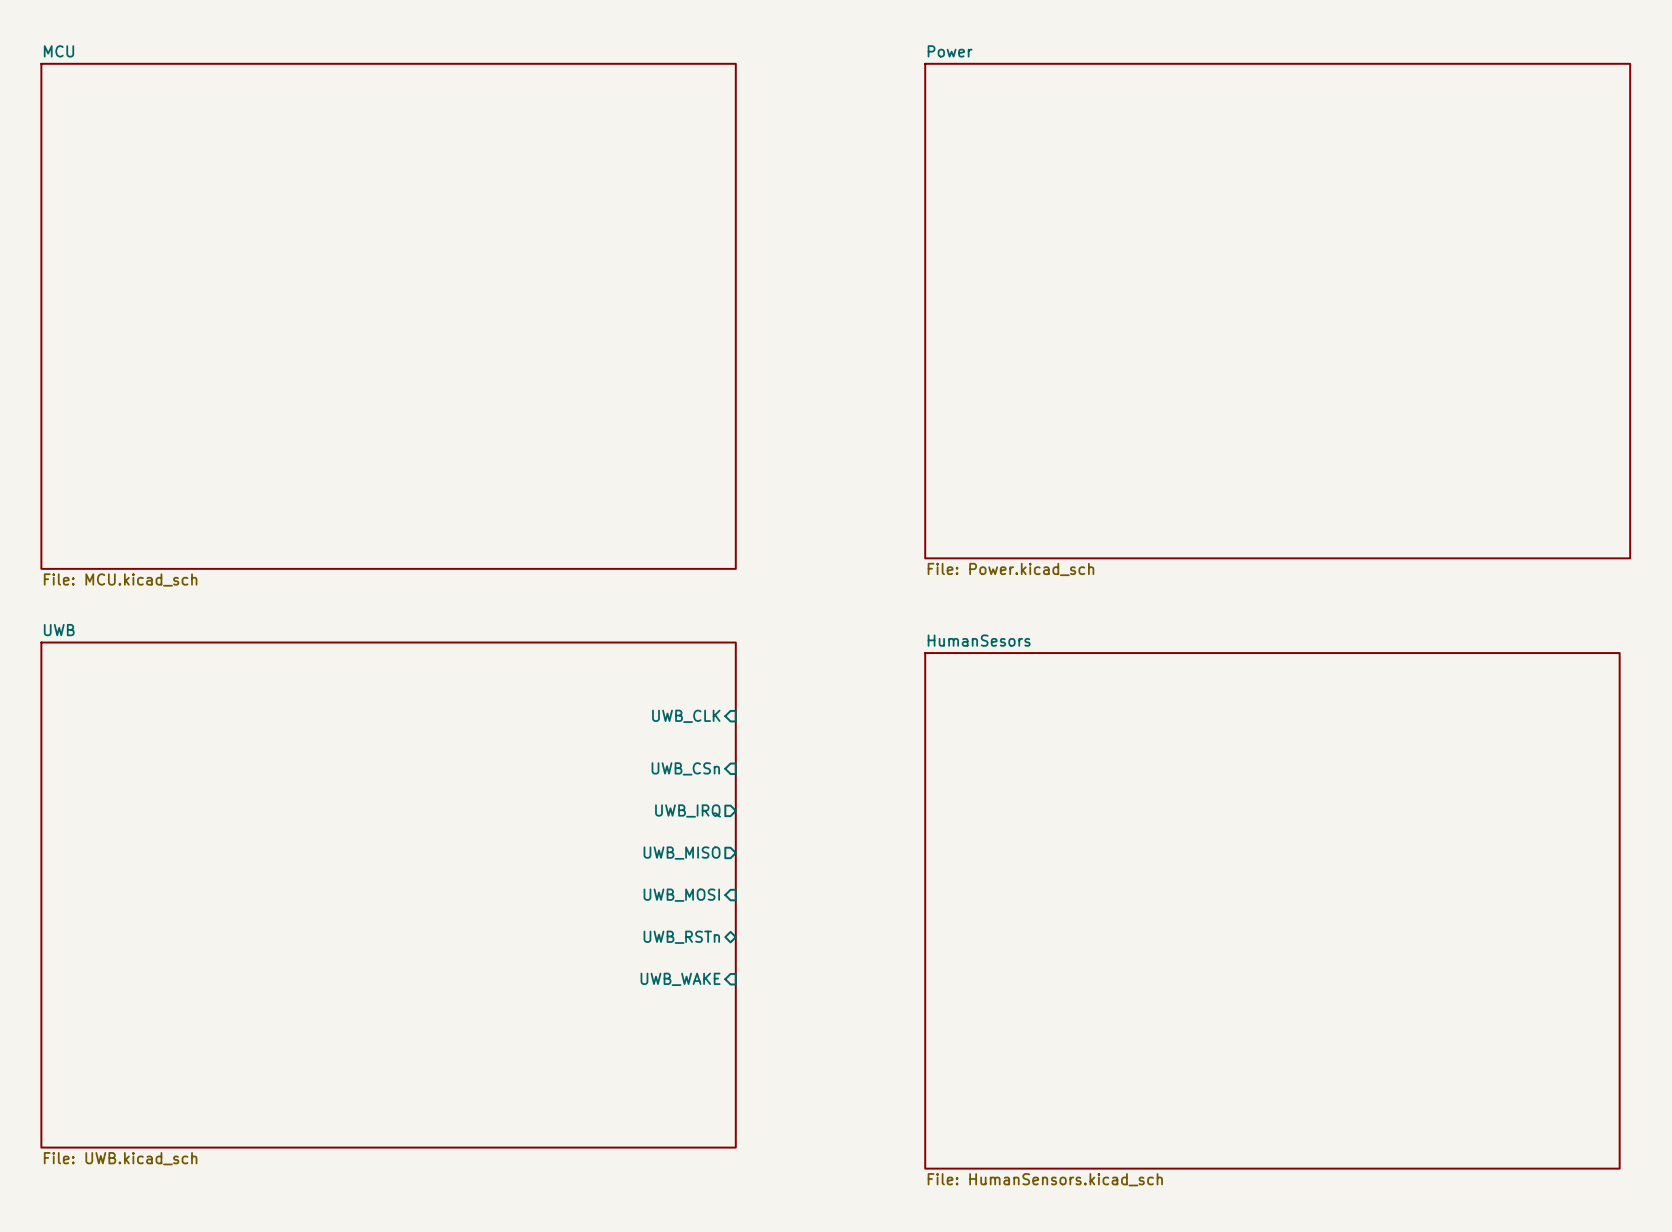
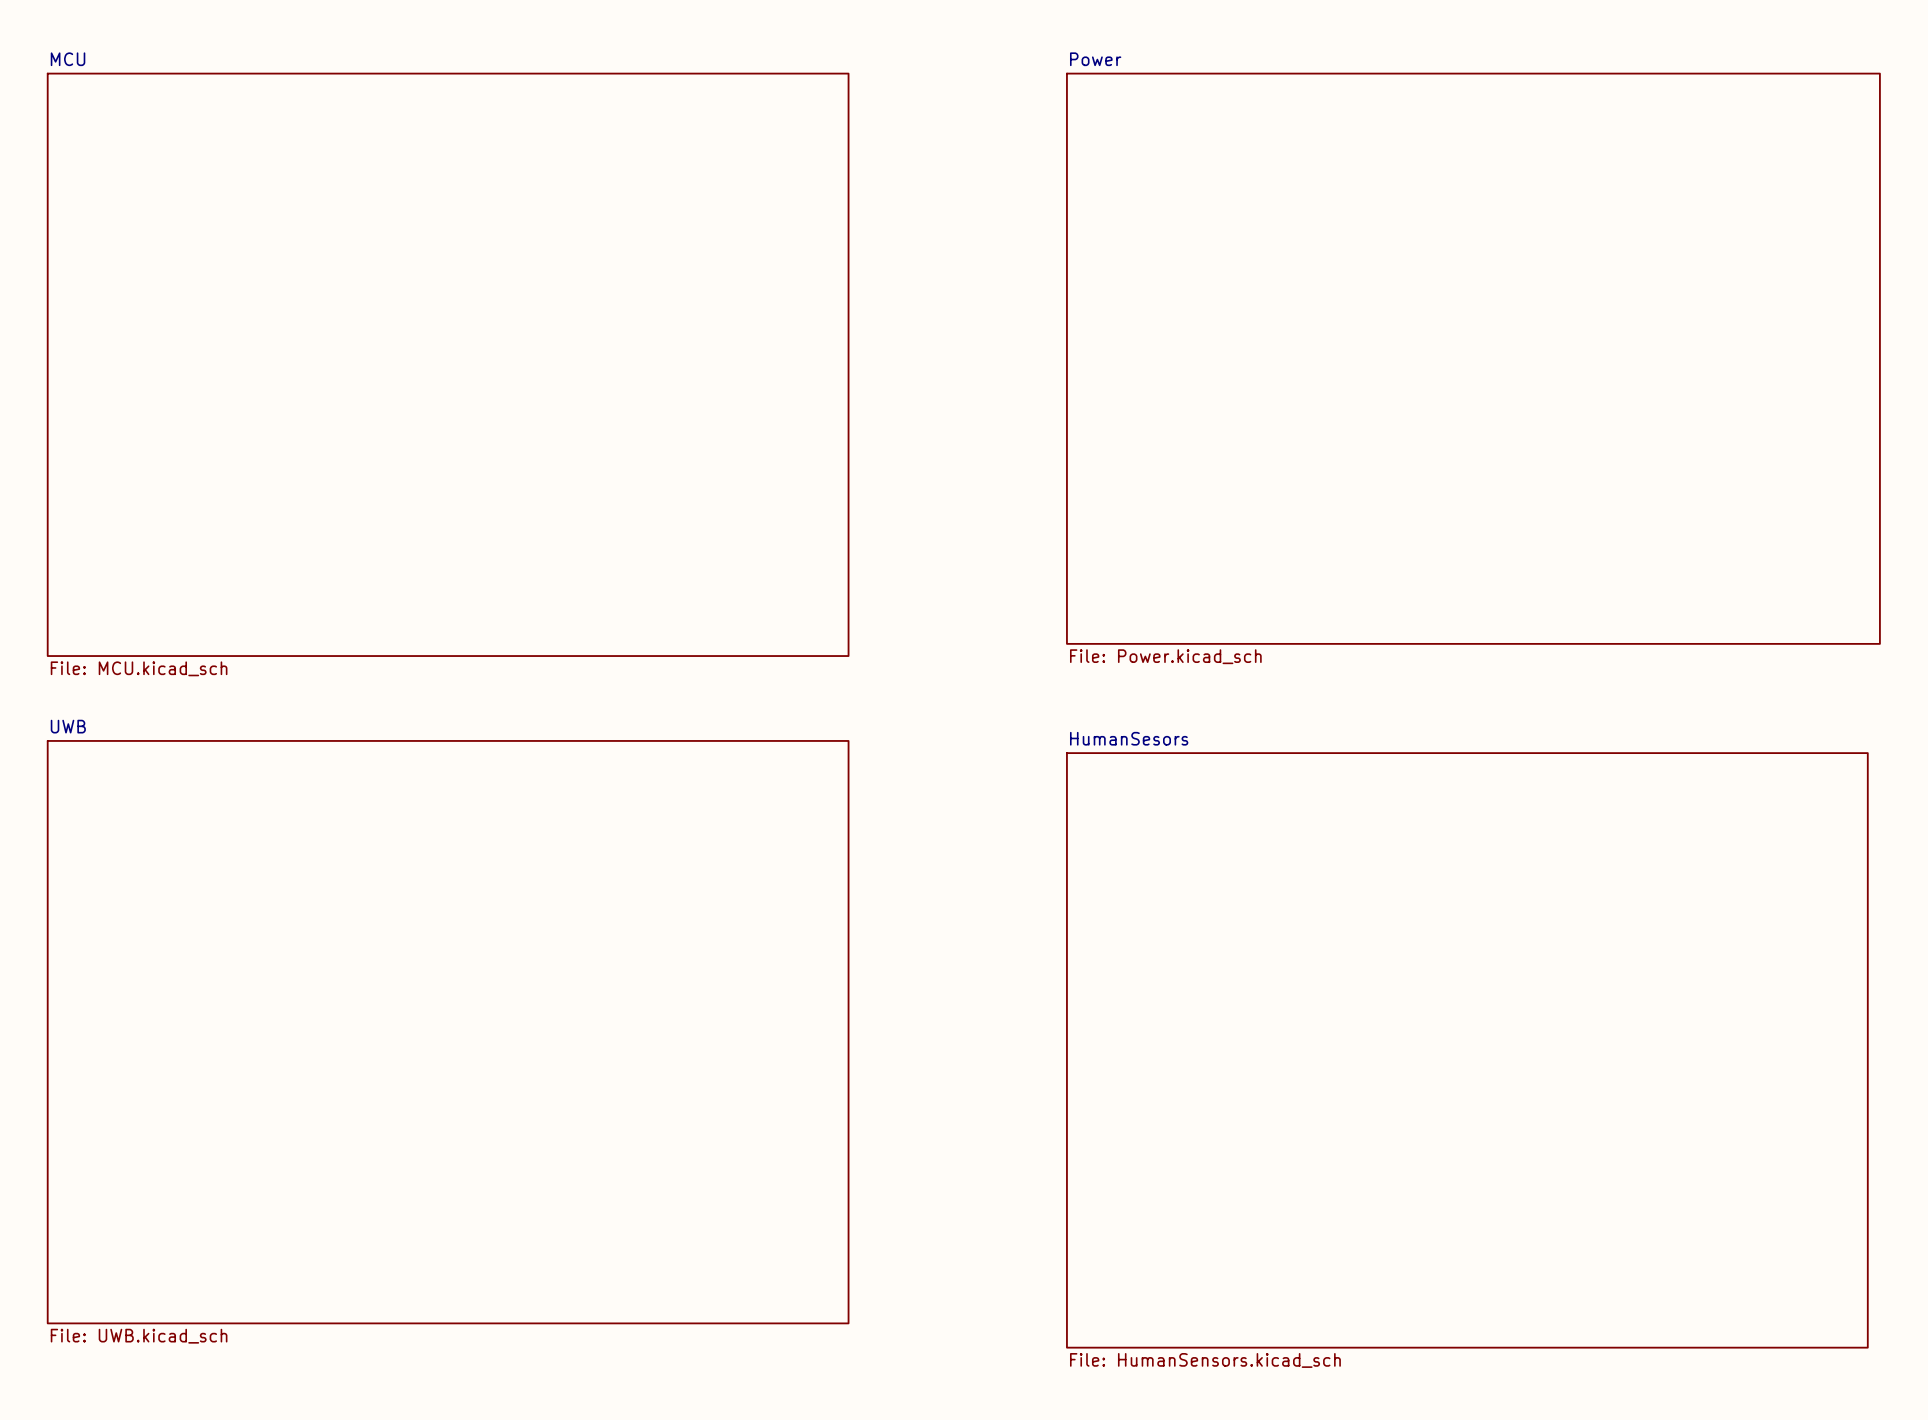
sheet pin: UWB_CLK (686, 716) -> none
sheet pin: UWB_CSn (685, 768) -> none
sheet pin: UWB_IRQ (688, 810) -> none
sheet pin: UWB_MISO (682, 853) -> none
sheet pin: UWB_MOSI (681, 895) -> none
sheet pin: UWB_RSTn (681, 937) -> none
sheet pin: UWB_WAKE (680, 979) -> none

